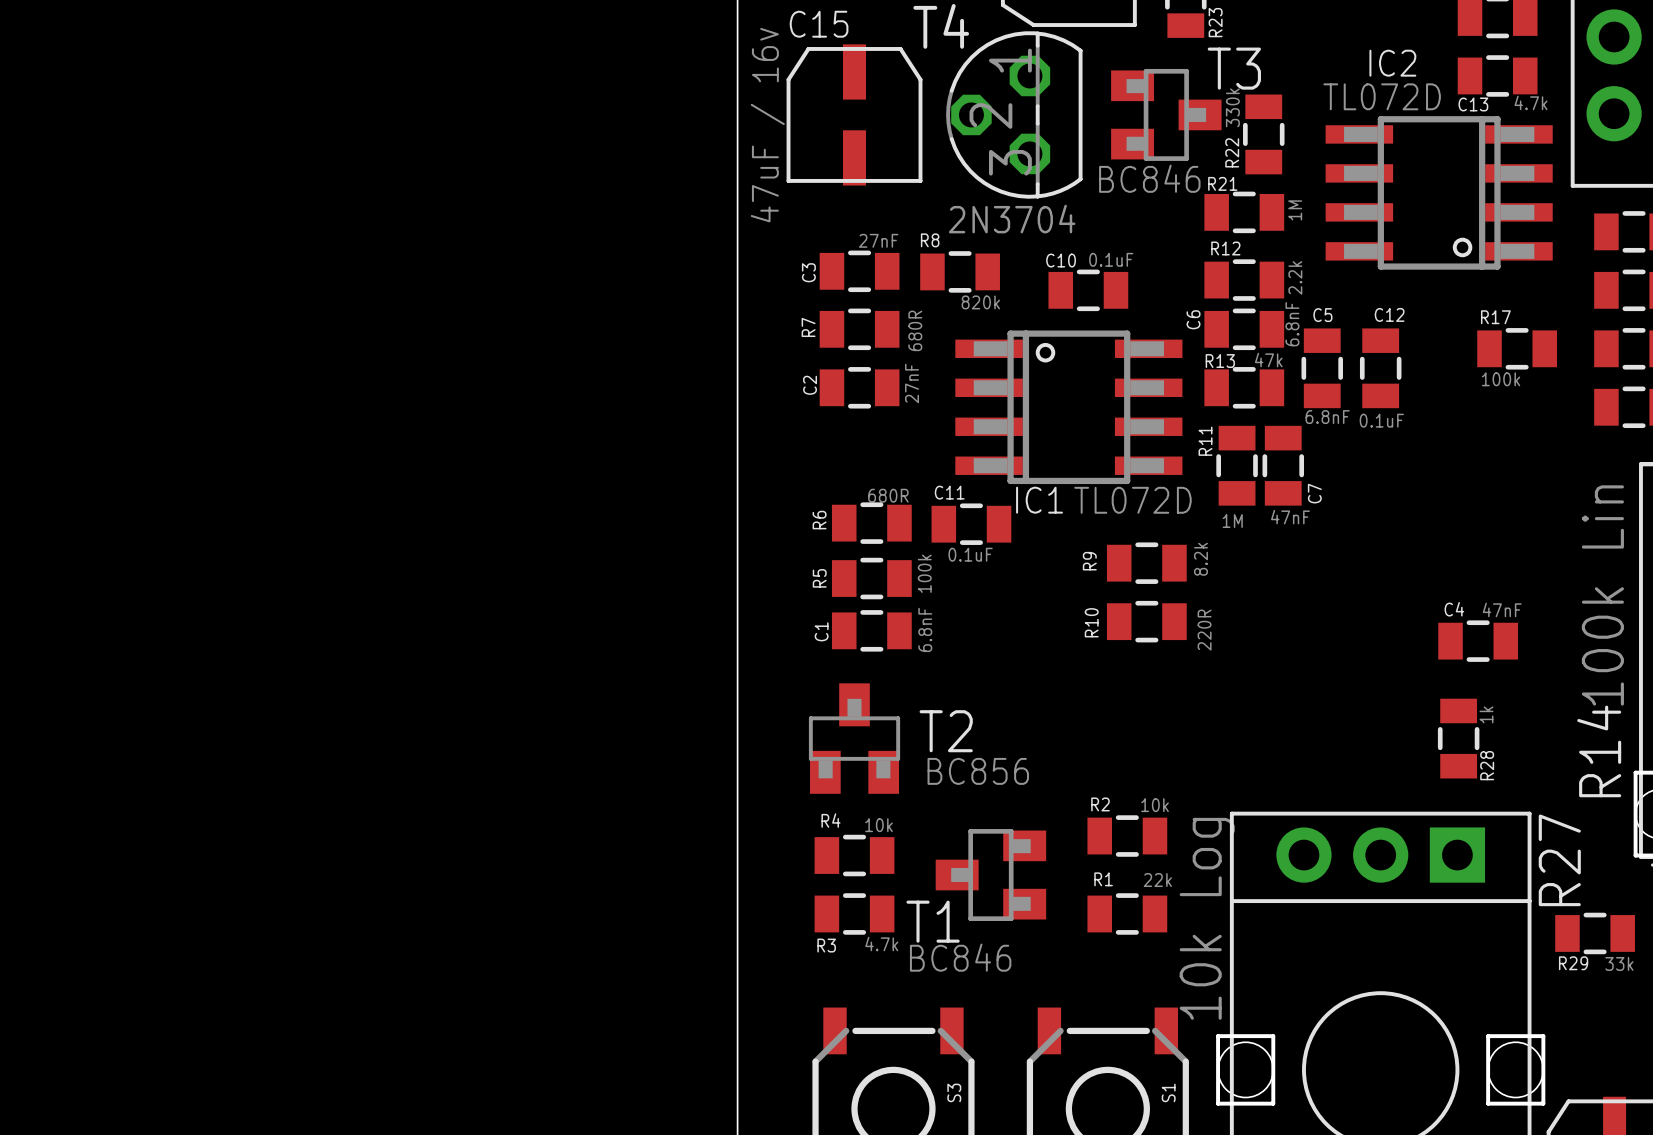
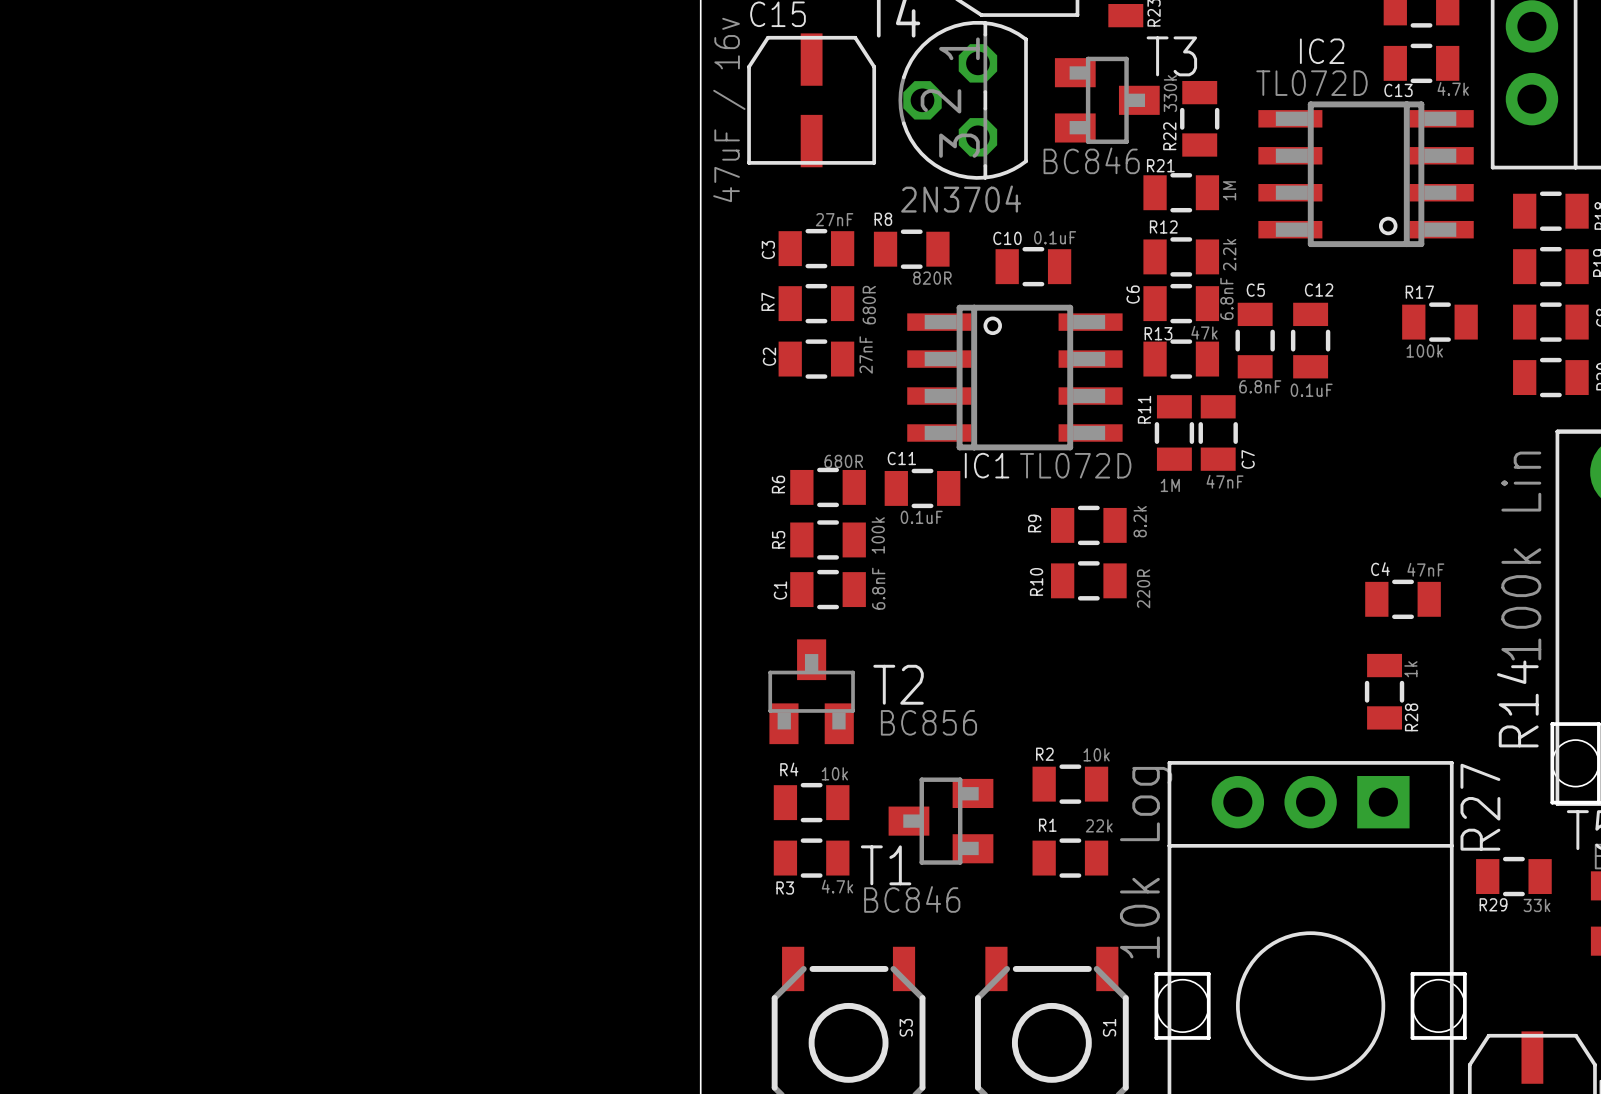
R8 value: 820k (980, 302) -> 820R (932, 278)

